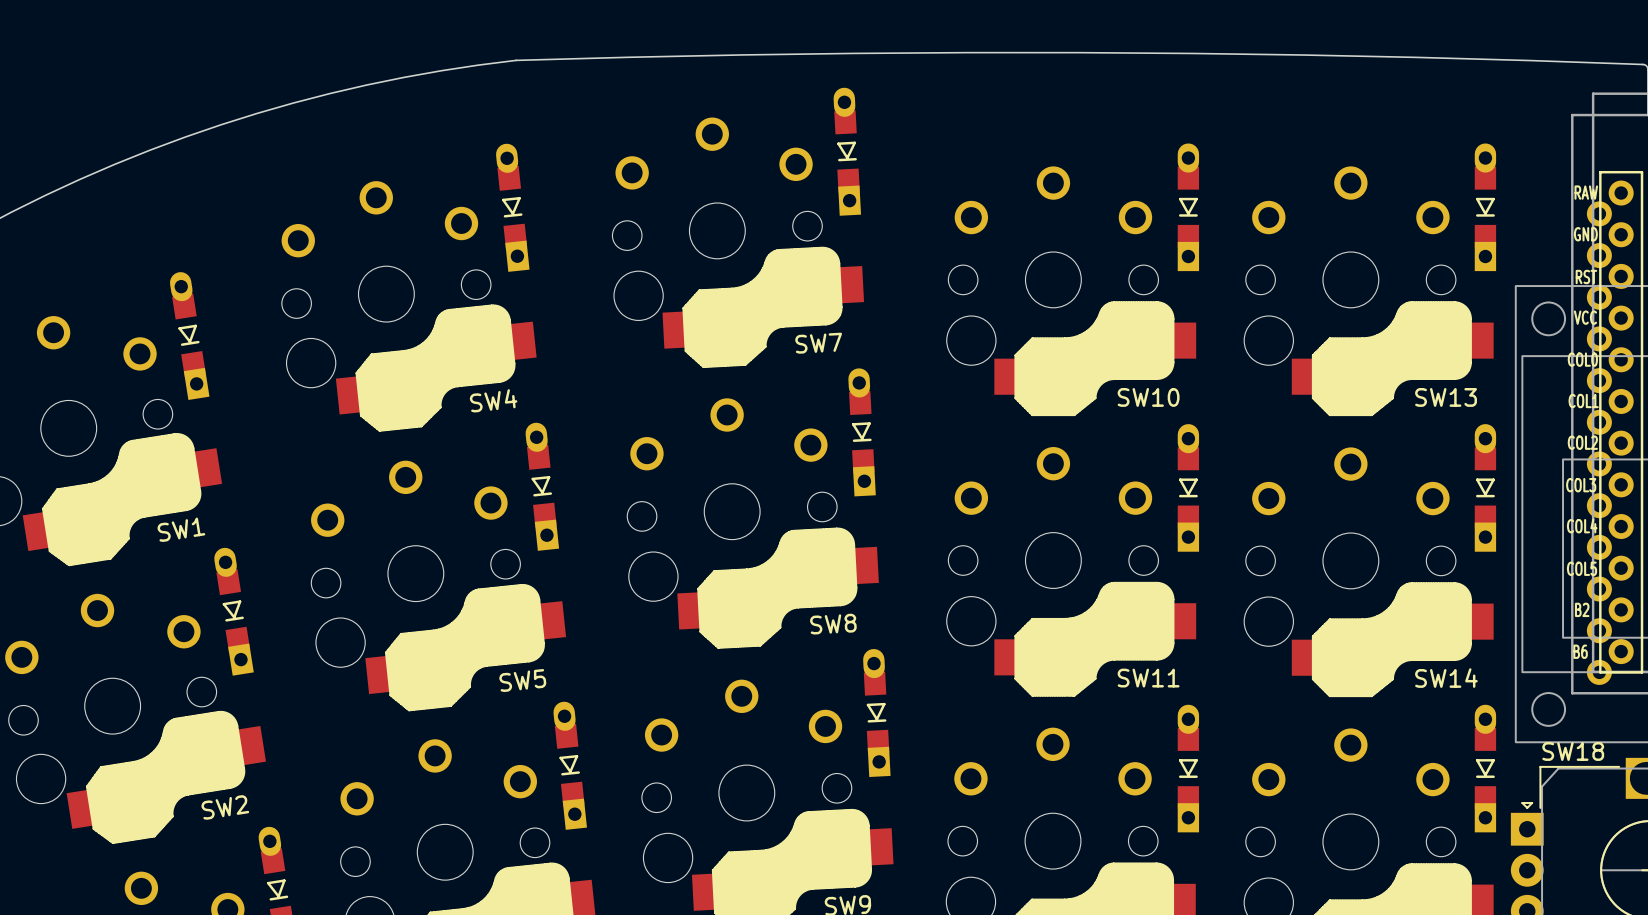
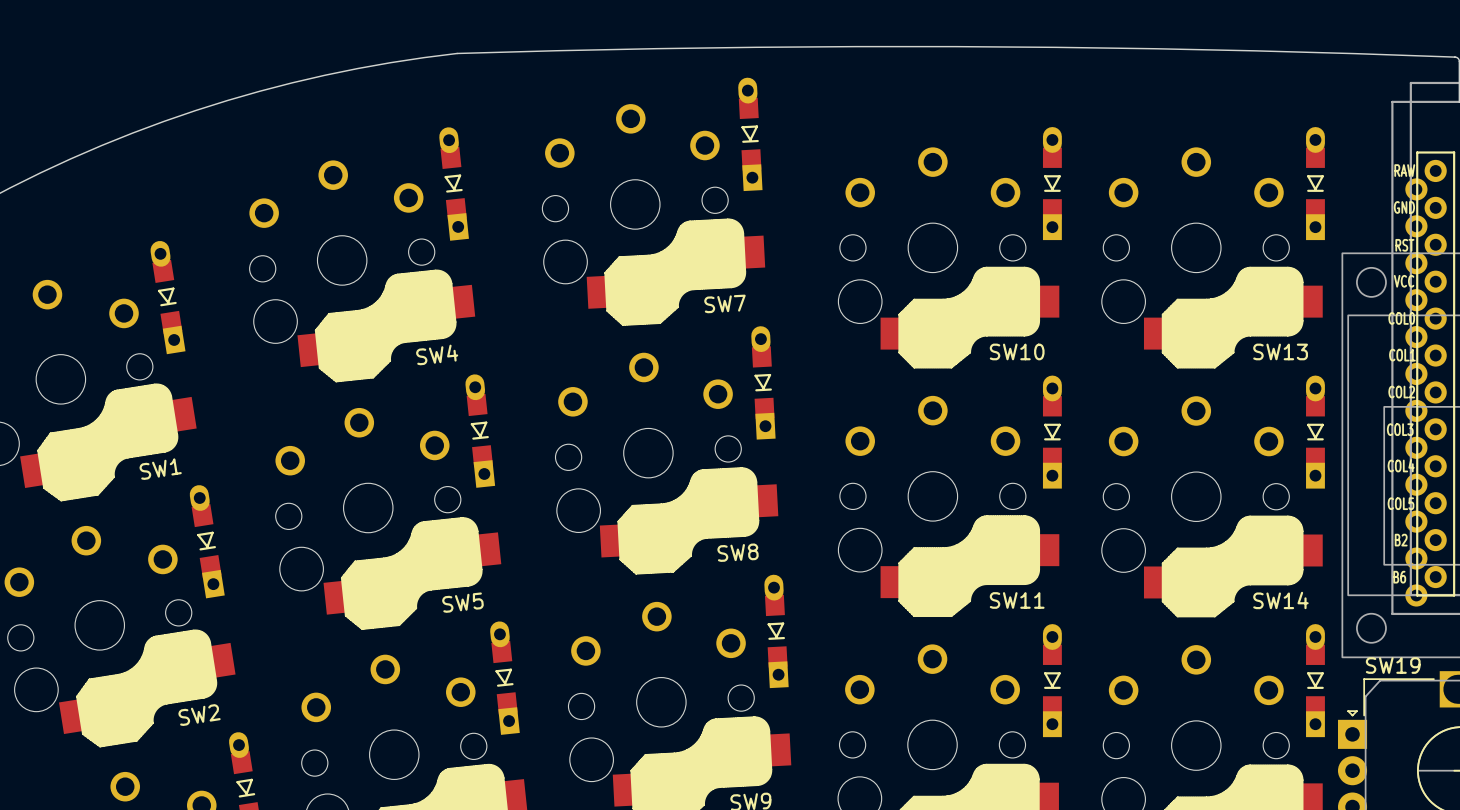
SW18 name: SW18 (1573, 751) -> SW19 (1393, 665)

